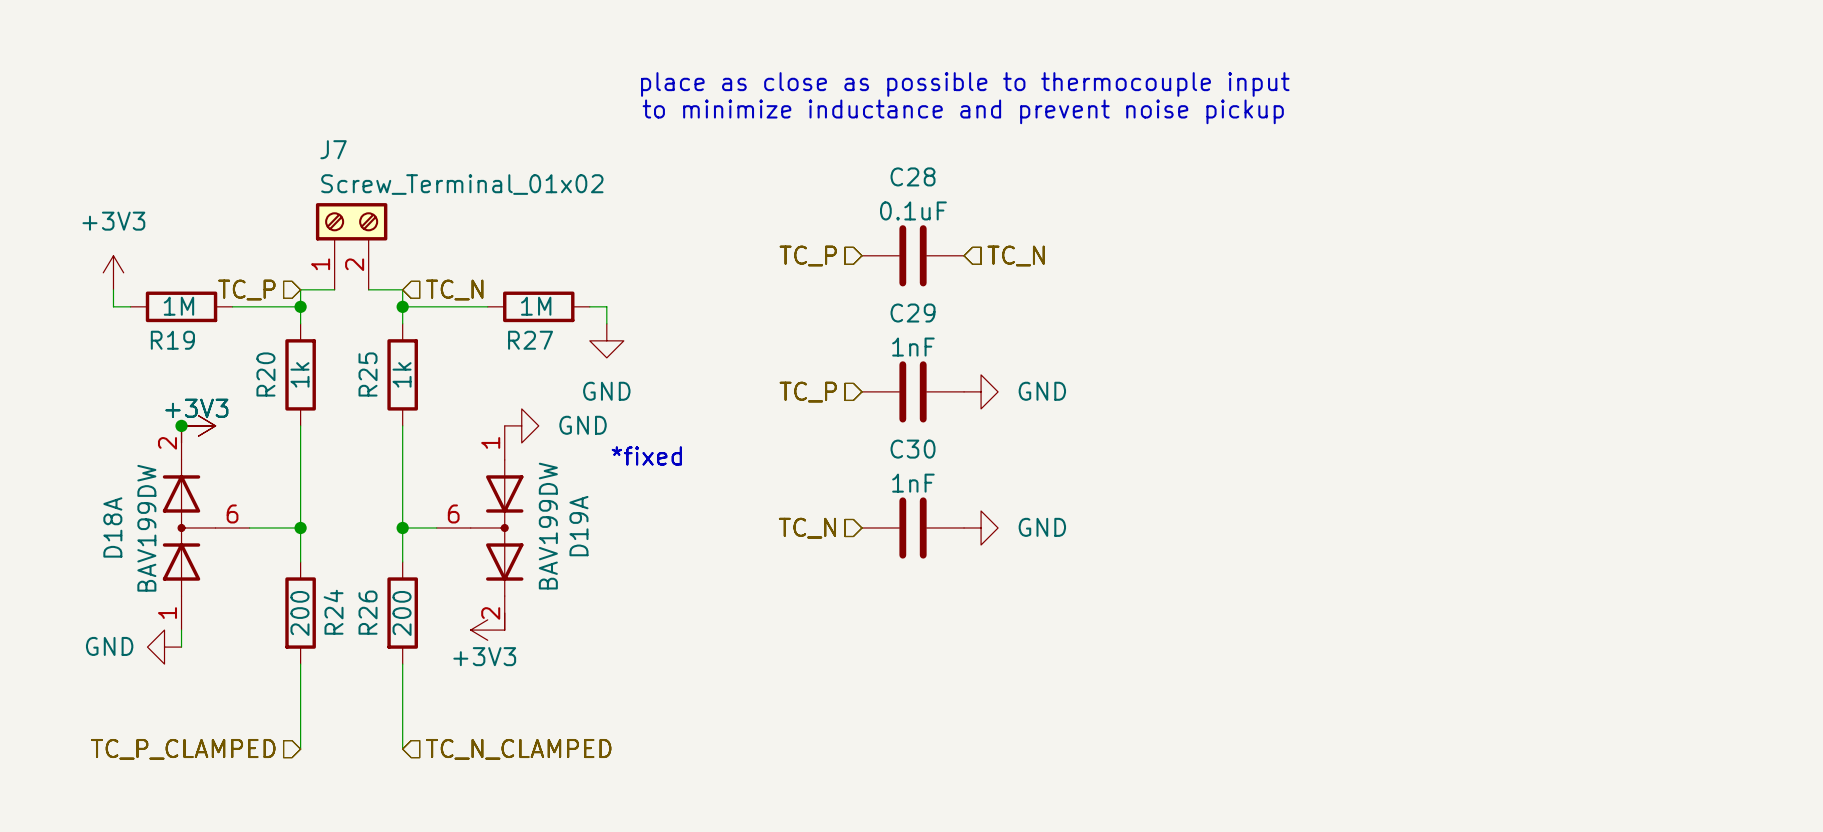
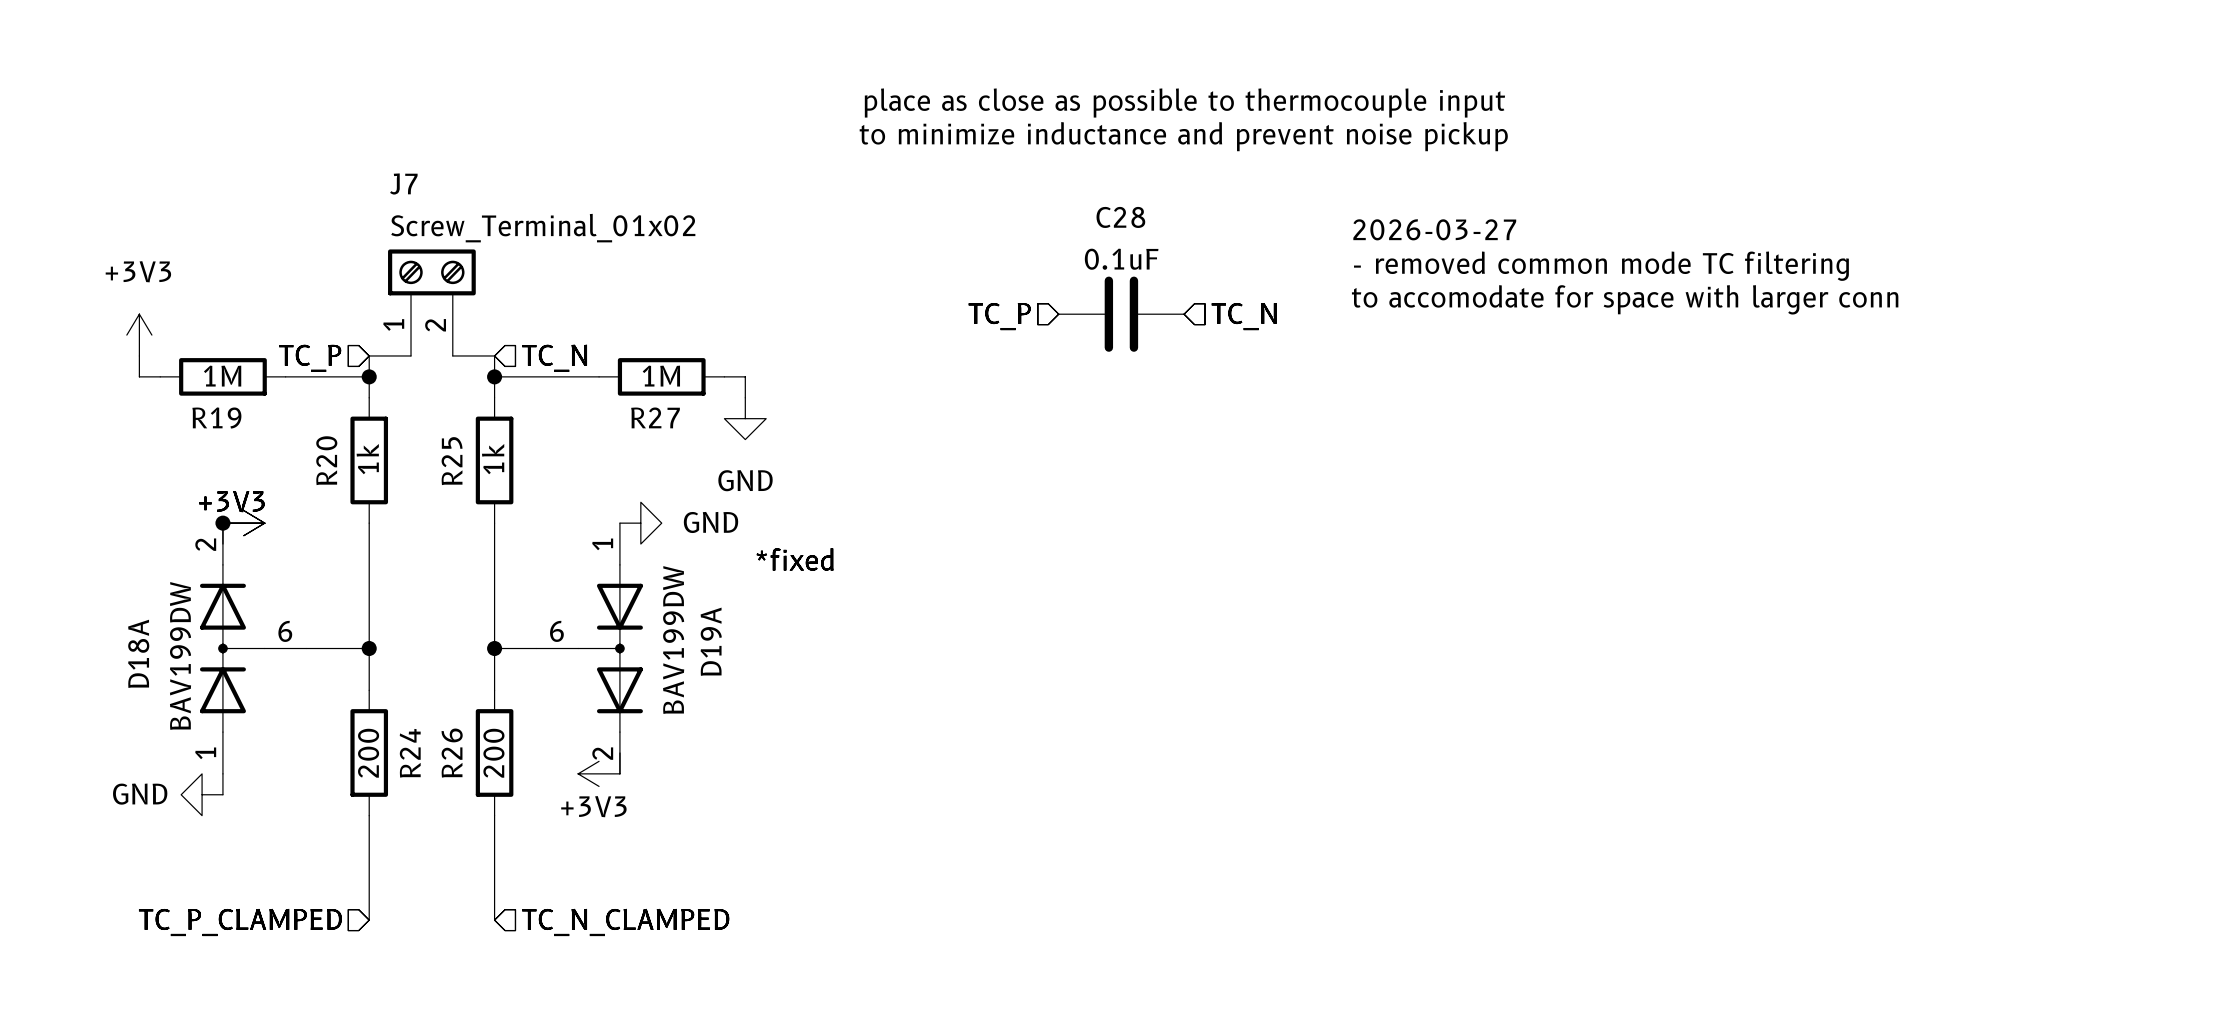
text: none -> 2026-03-27 (1434, 229)
text: none -> - removed common mode TC filtering (1601, 266)
text: none -> to accomodate for space with larger conn (1625, 299)
C29: 1nF (913, 391) -> none
power symbol: GND (981, 391) -> none
hierarchical label: TC_P (808, 392) -> none
C30: 1nF (913, 527) -> none
power symbol: GND (981, 527) -> none
hierarchical label: TC_N (807, 528) -> none

